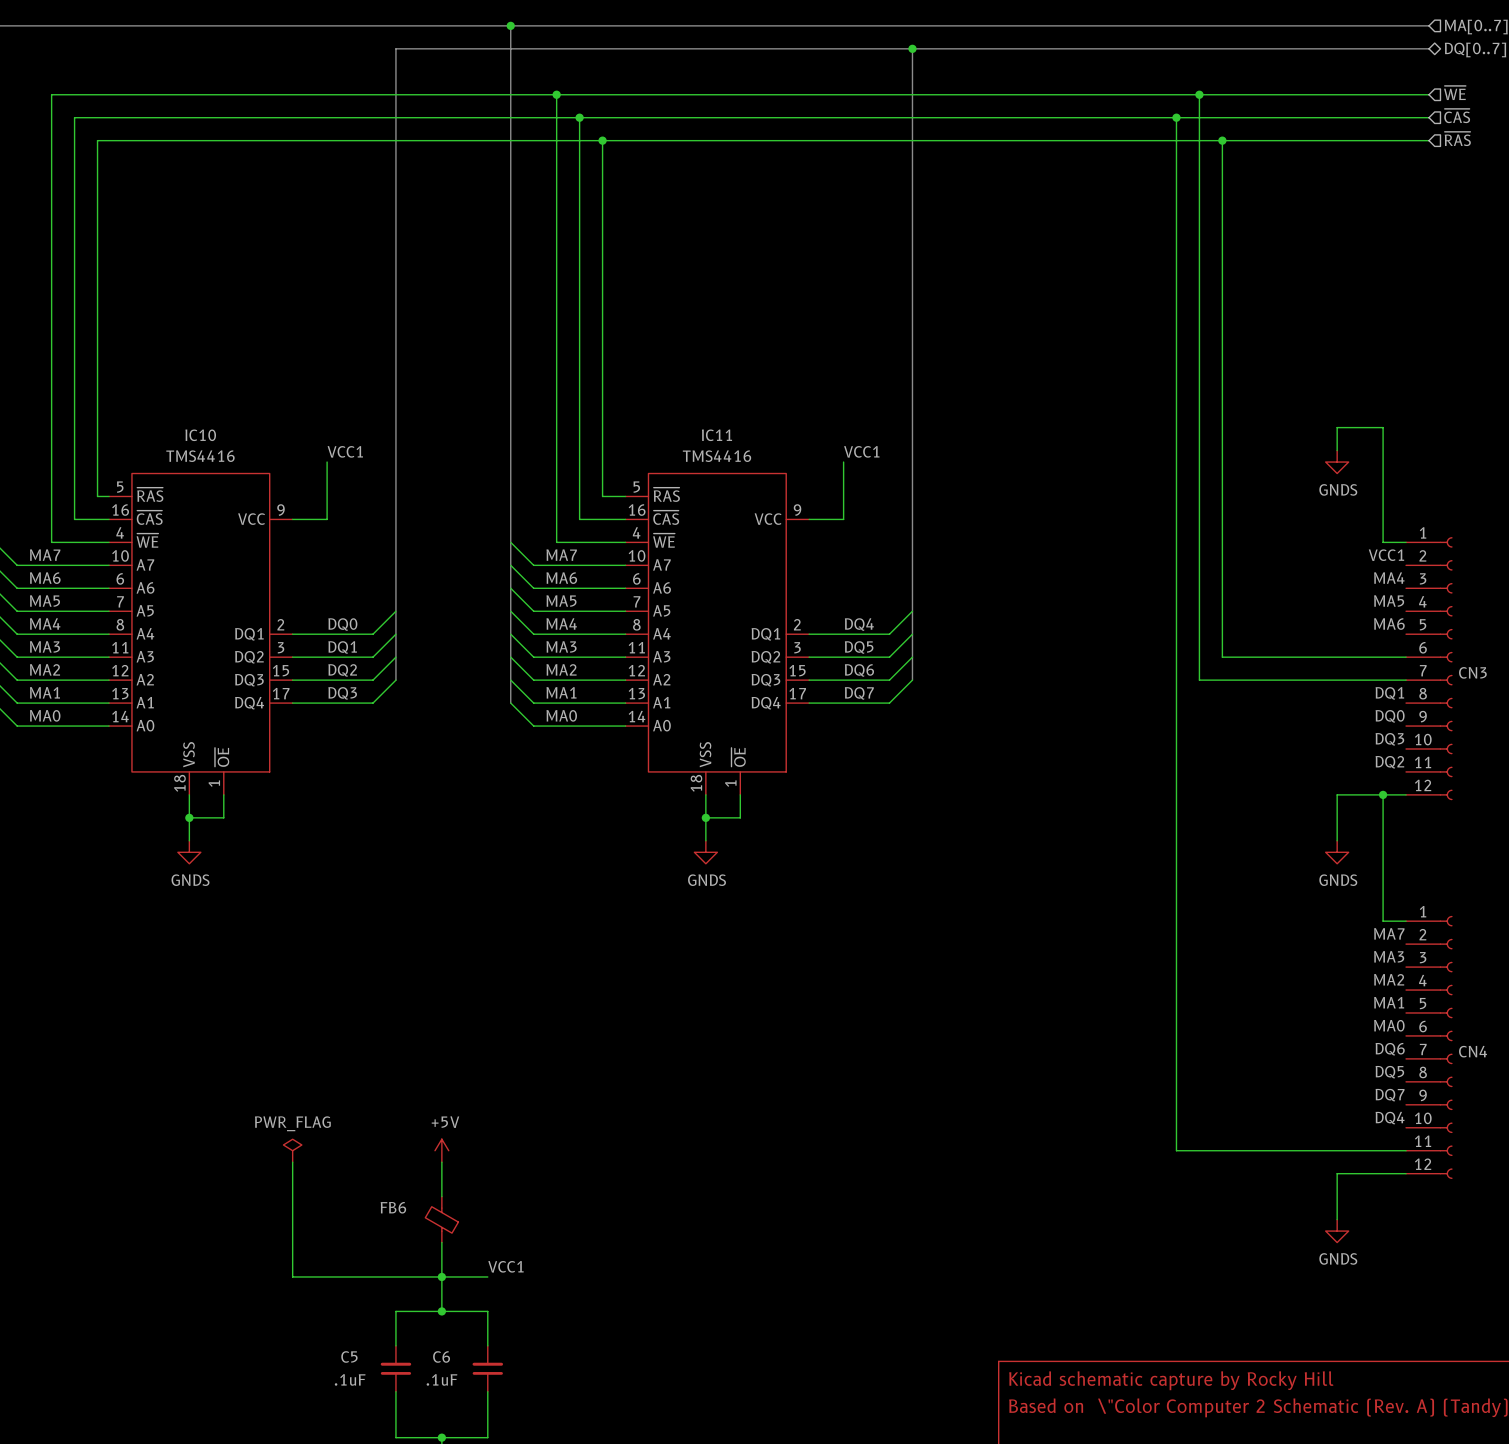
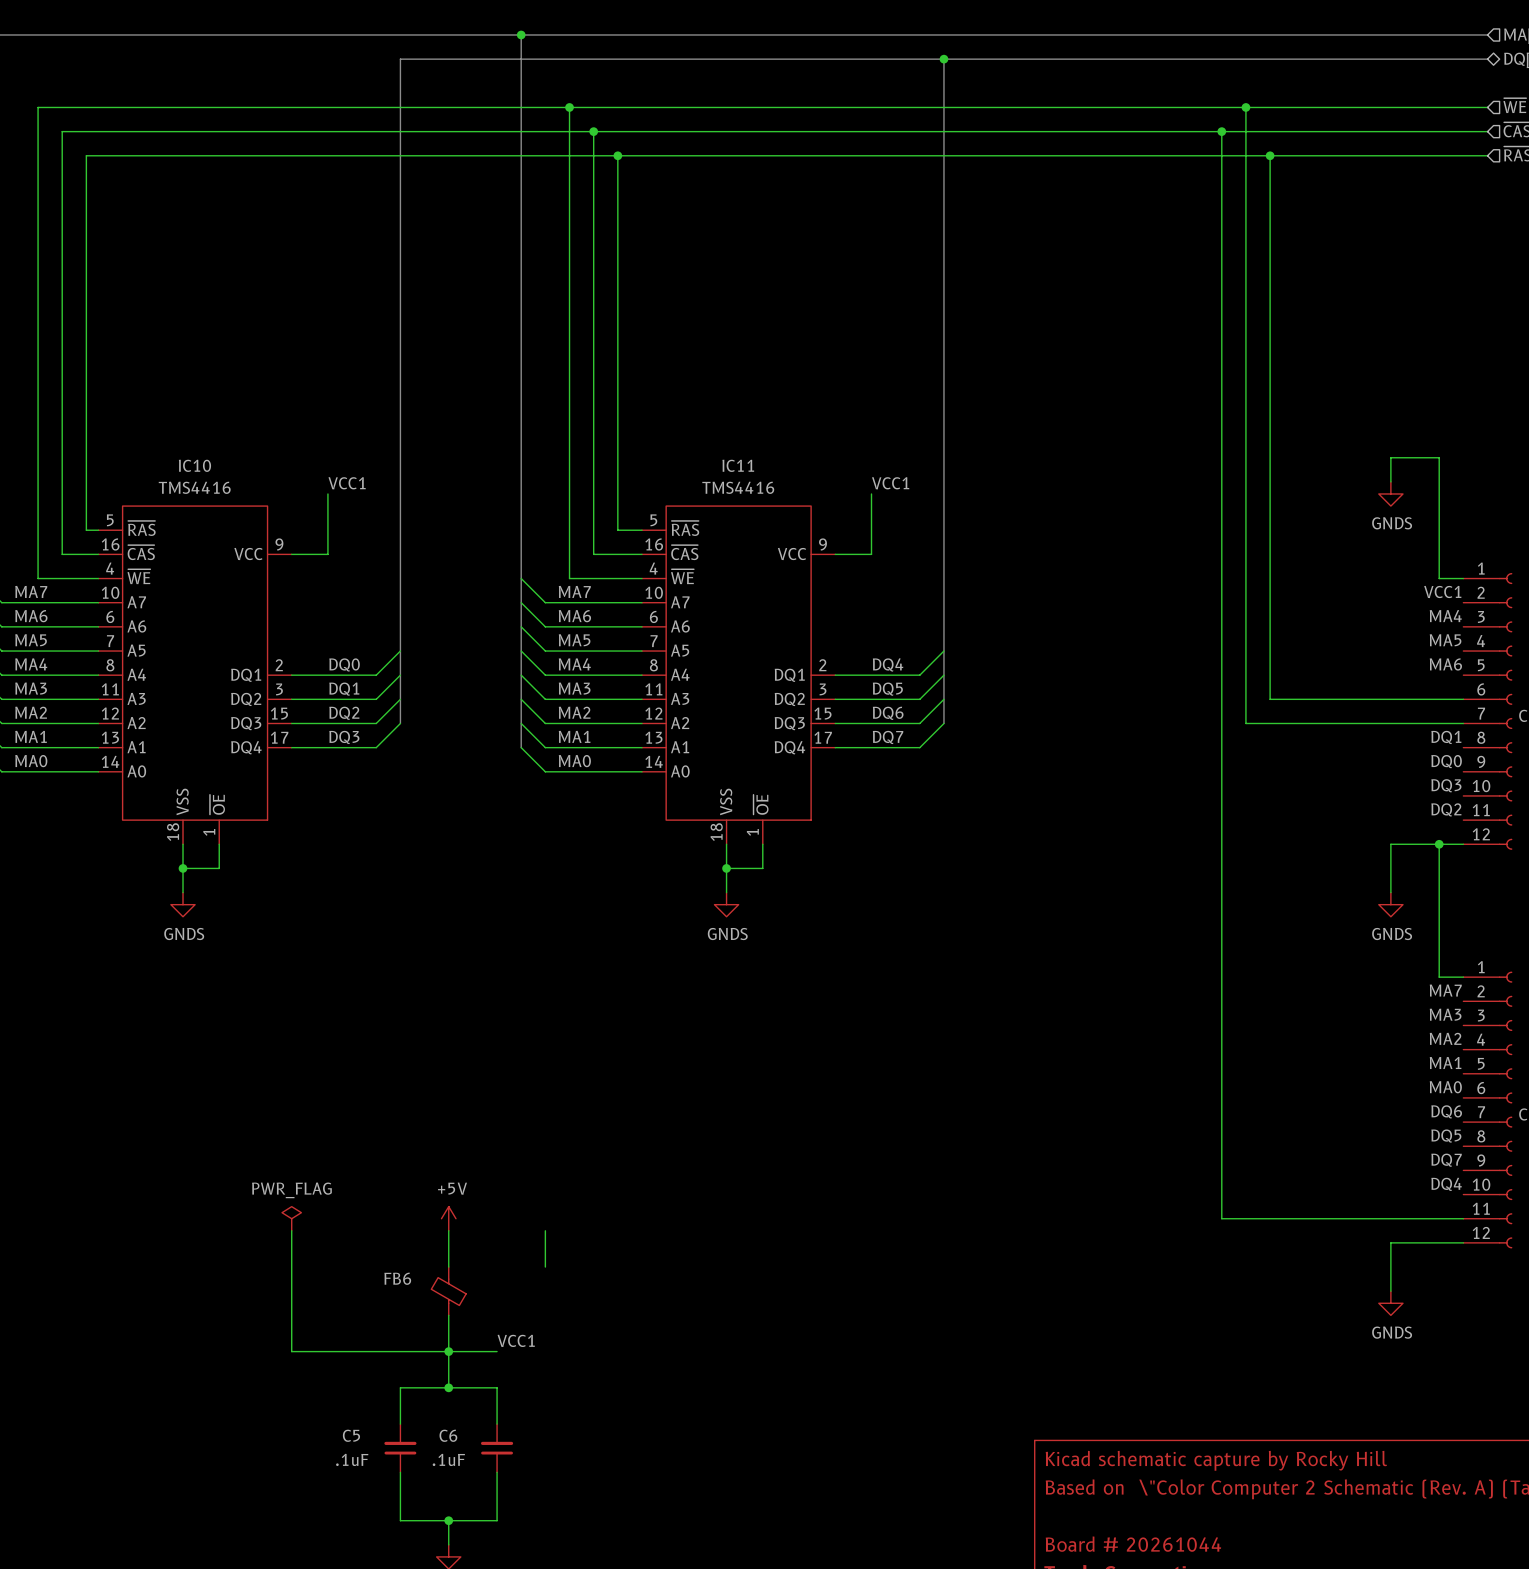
wire: none -> (545, 1230) (545, 1267)

